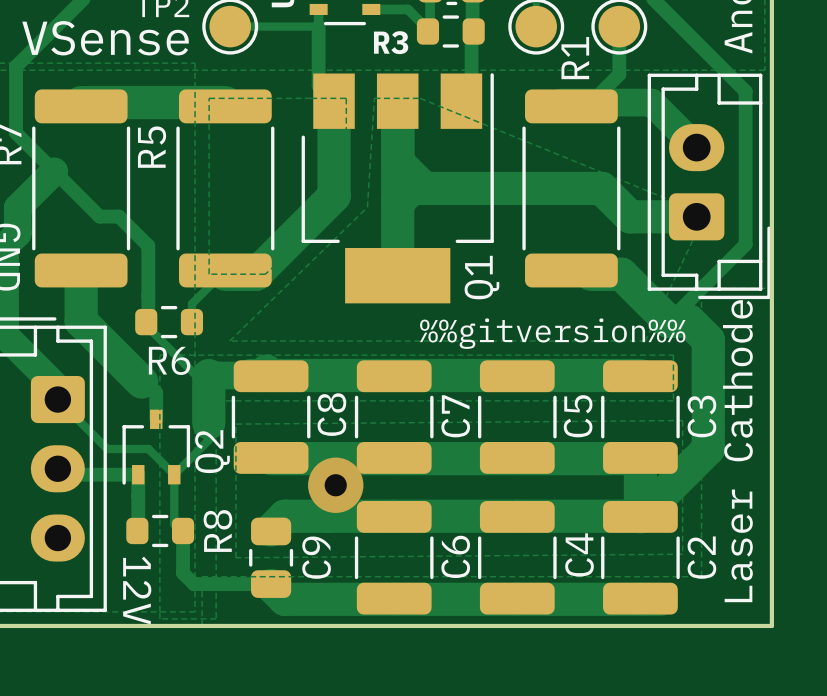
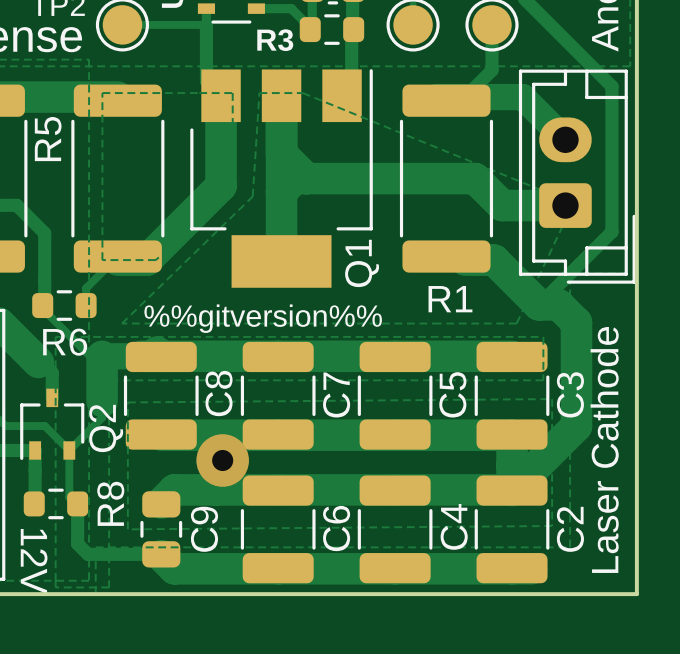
R1 name rotation: 0° (575, 58) -> 90° clockwise (450, 299)
R1 name position: R1 (575, 58) -> R1 (450, 299)
text position: %%gitversion%% (552, 333) -> %%gitversion%% (263, 318)

